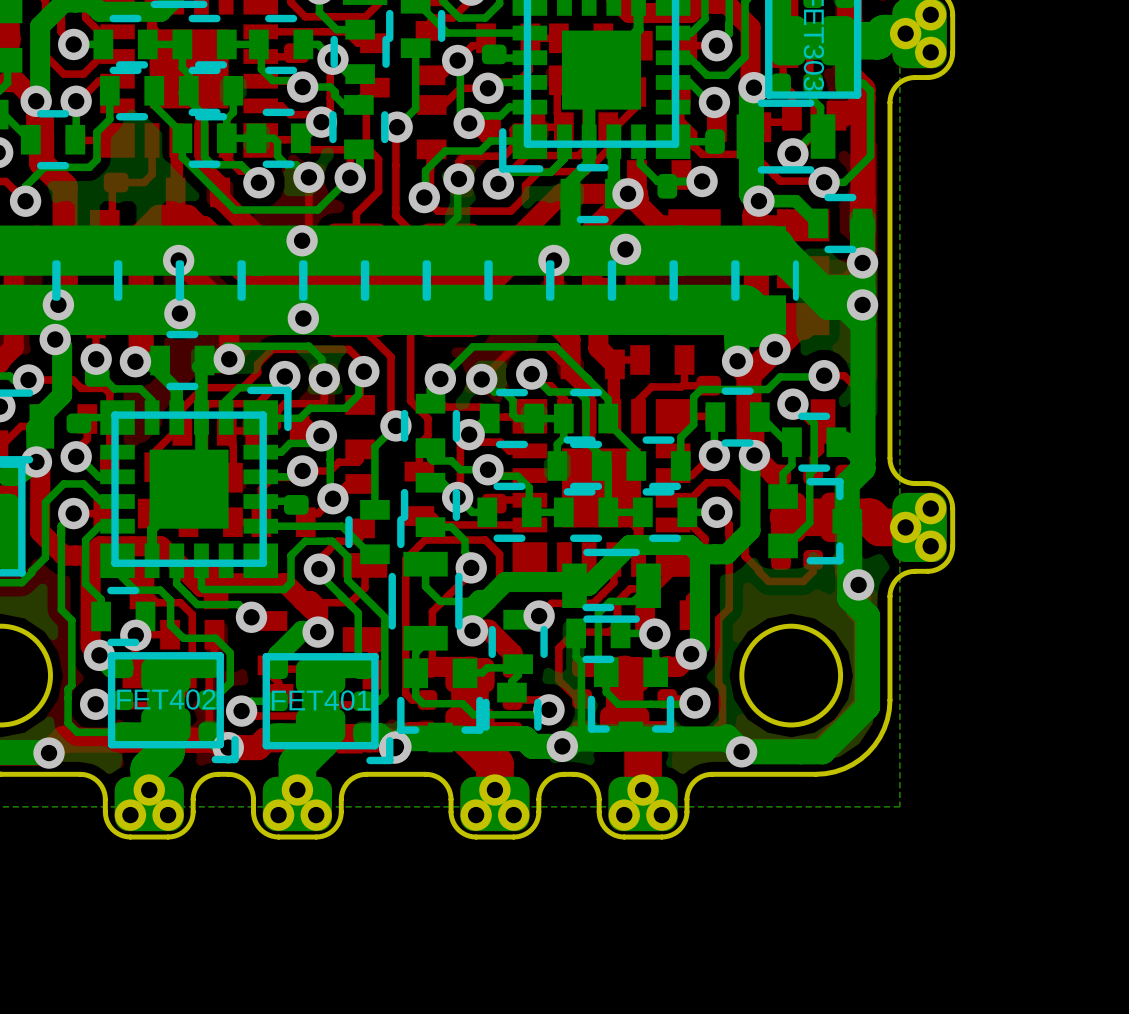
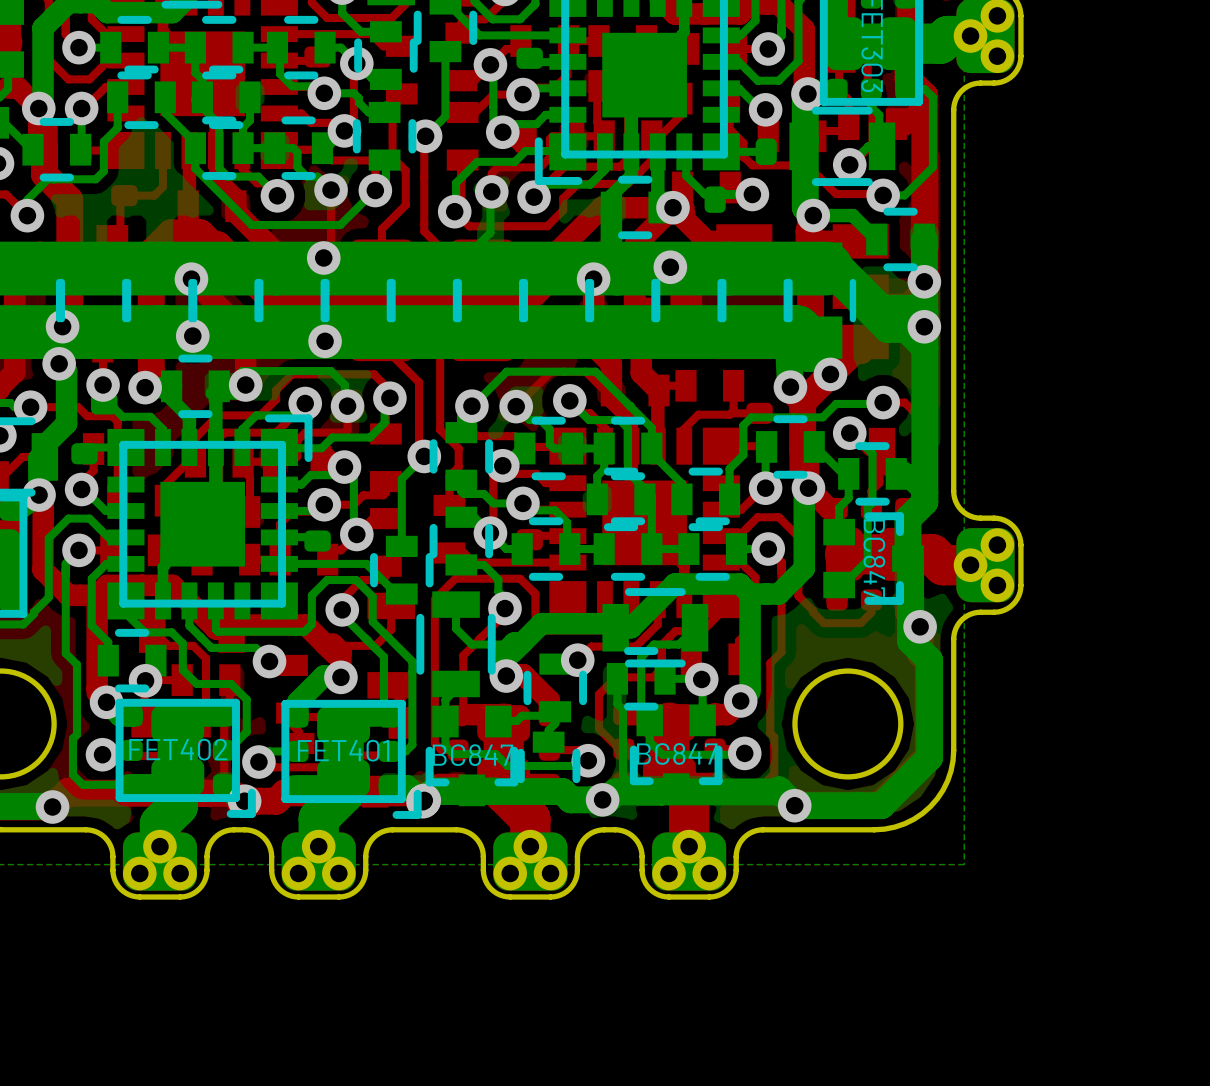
part value: none -> BC847 (874, 559)
part value: none -> BC847 (677, 753)
part value: none -> BC847 (473, 755)

